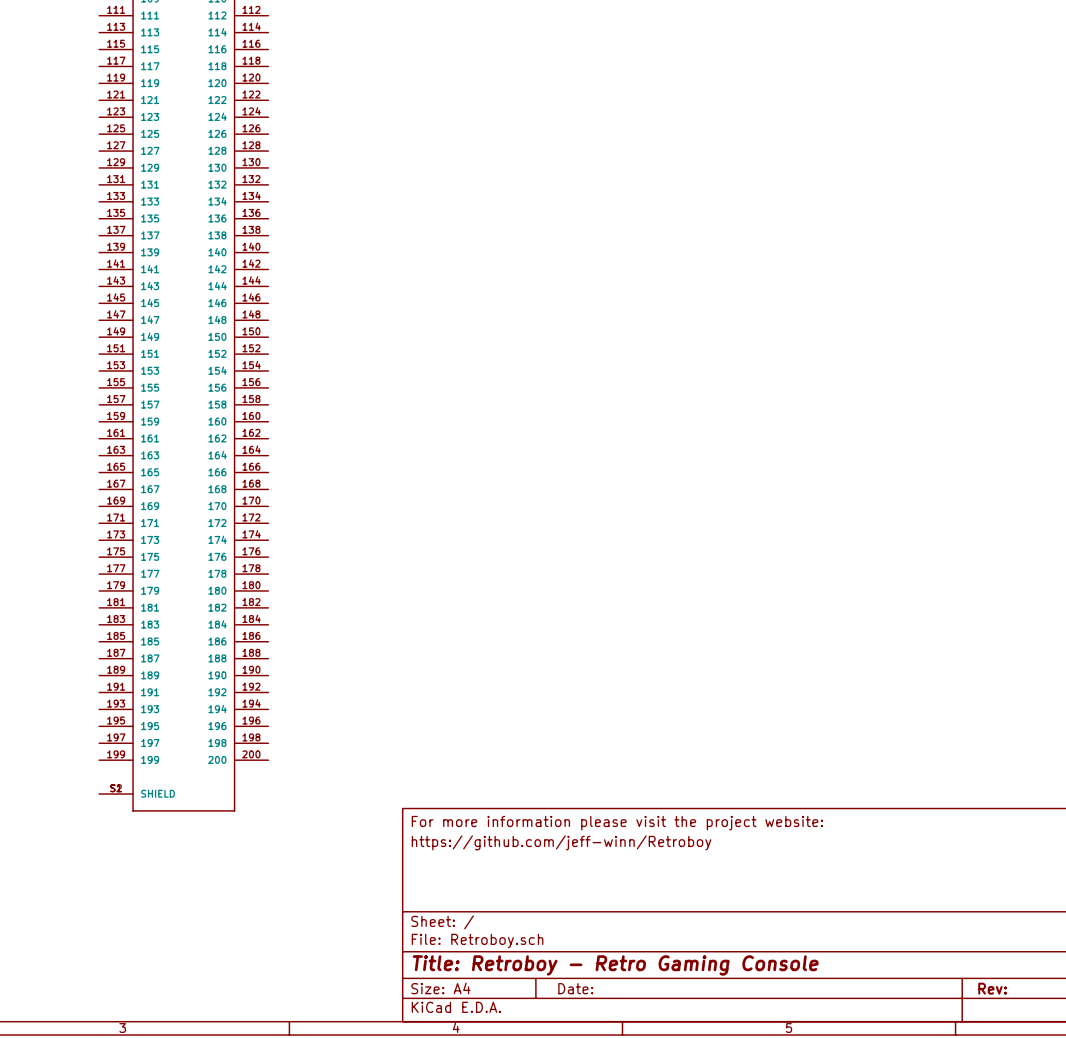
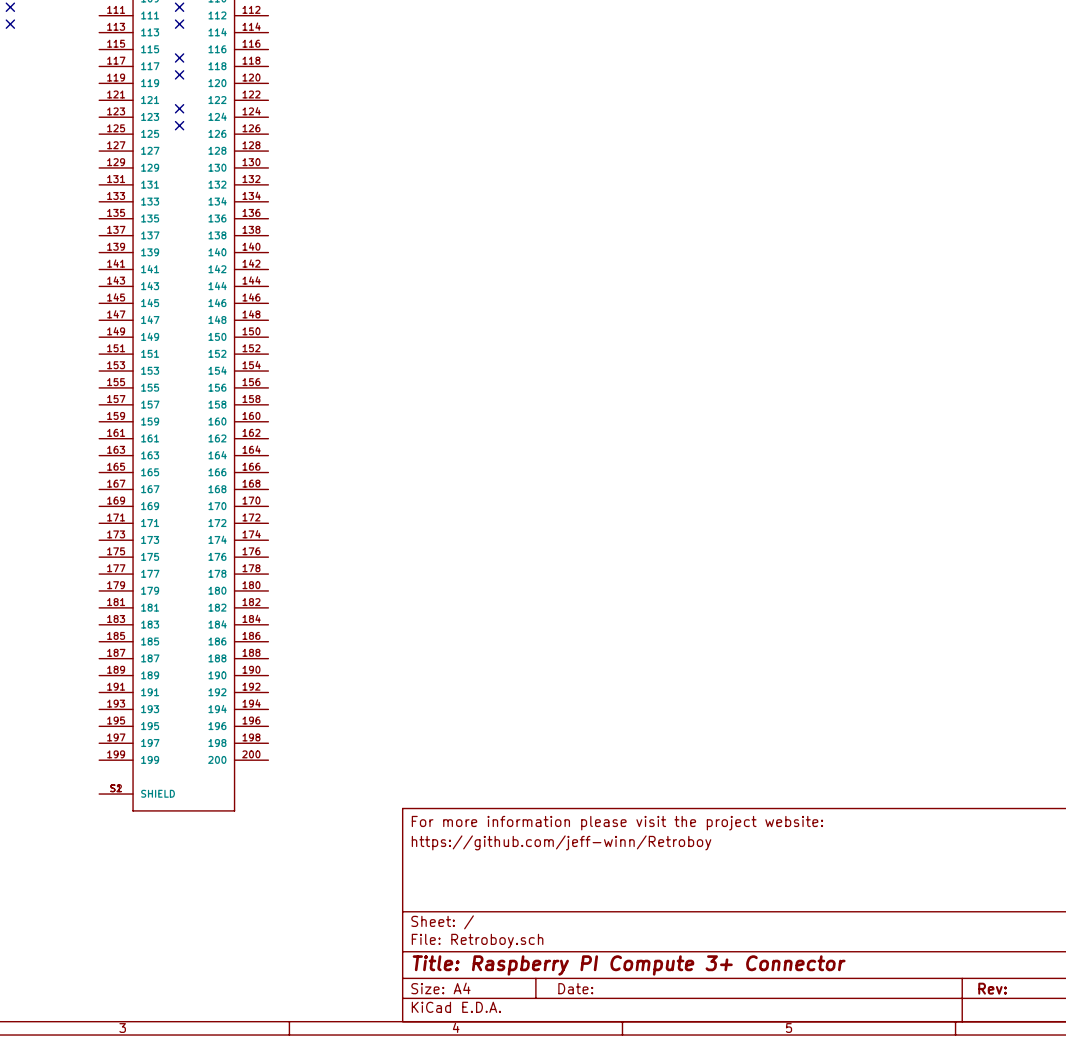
no-connect mark: none -> (10, 7)
no-connect mark: none -> (179, 7)
no-connect mark: none -> (10, 24)
no-connect mark: none -> (179, 24)
no-connect mark: none -> (179, 57)
no-connect mark: none -> (179, 74)
no-connect mark: none -> (179, 108)
no-connect mark: none -> (179, 125)
title block: Title: Retroboy - Retro Gaming Console (615, 965) -> Title: Raspberry PI Compute 3+ Connector (629, 965)

